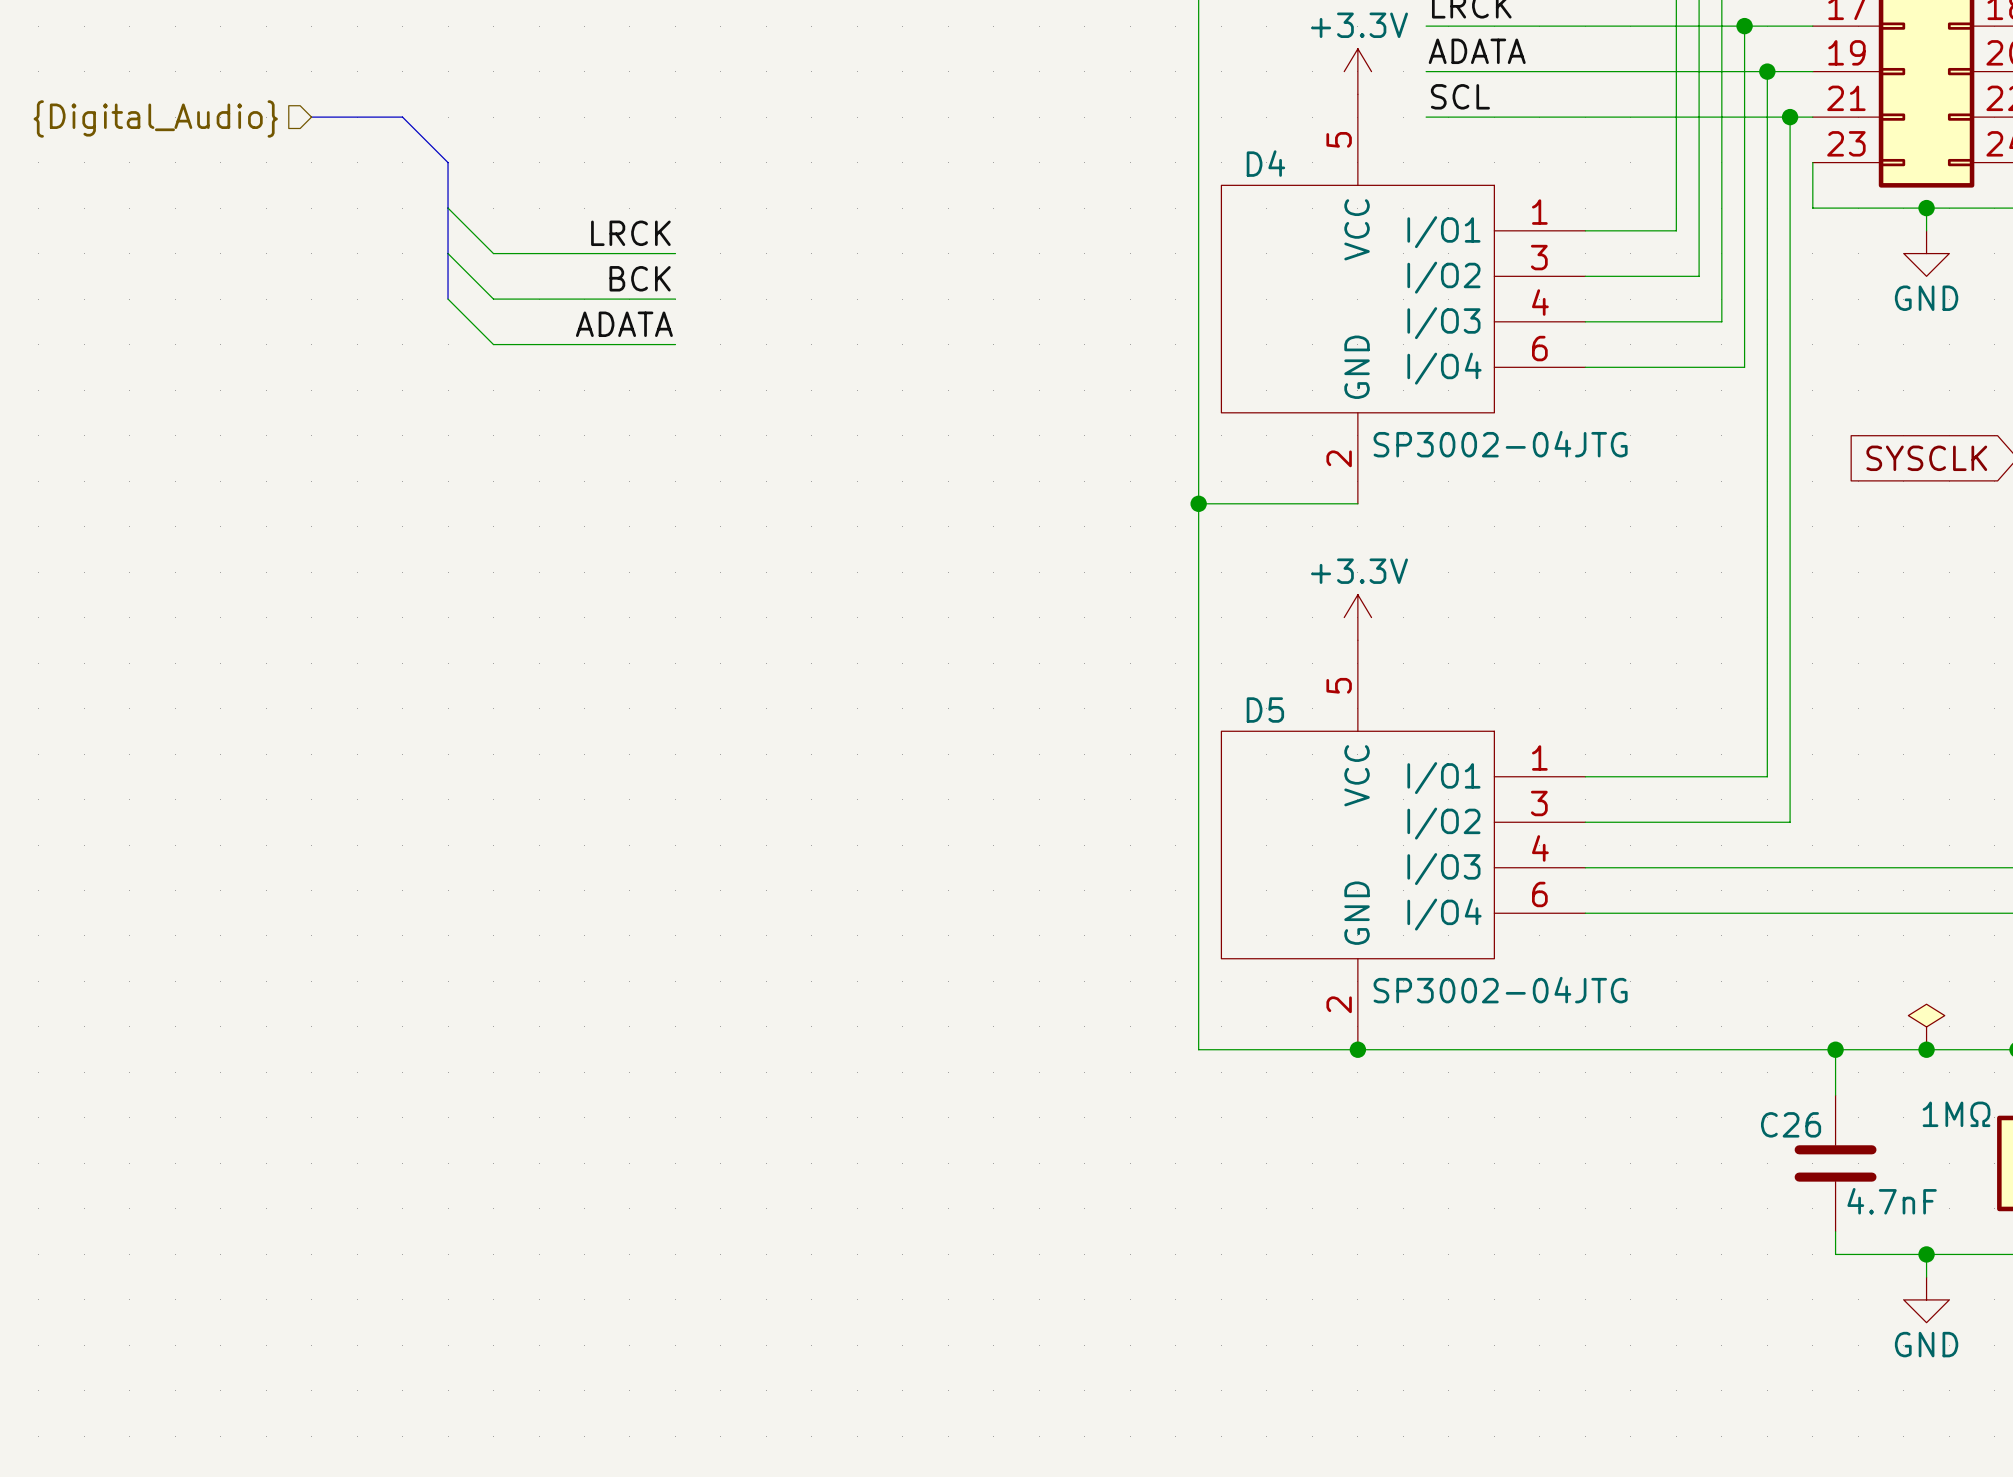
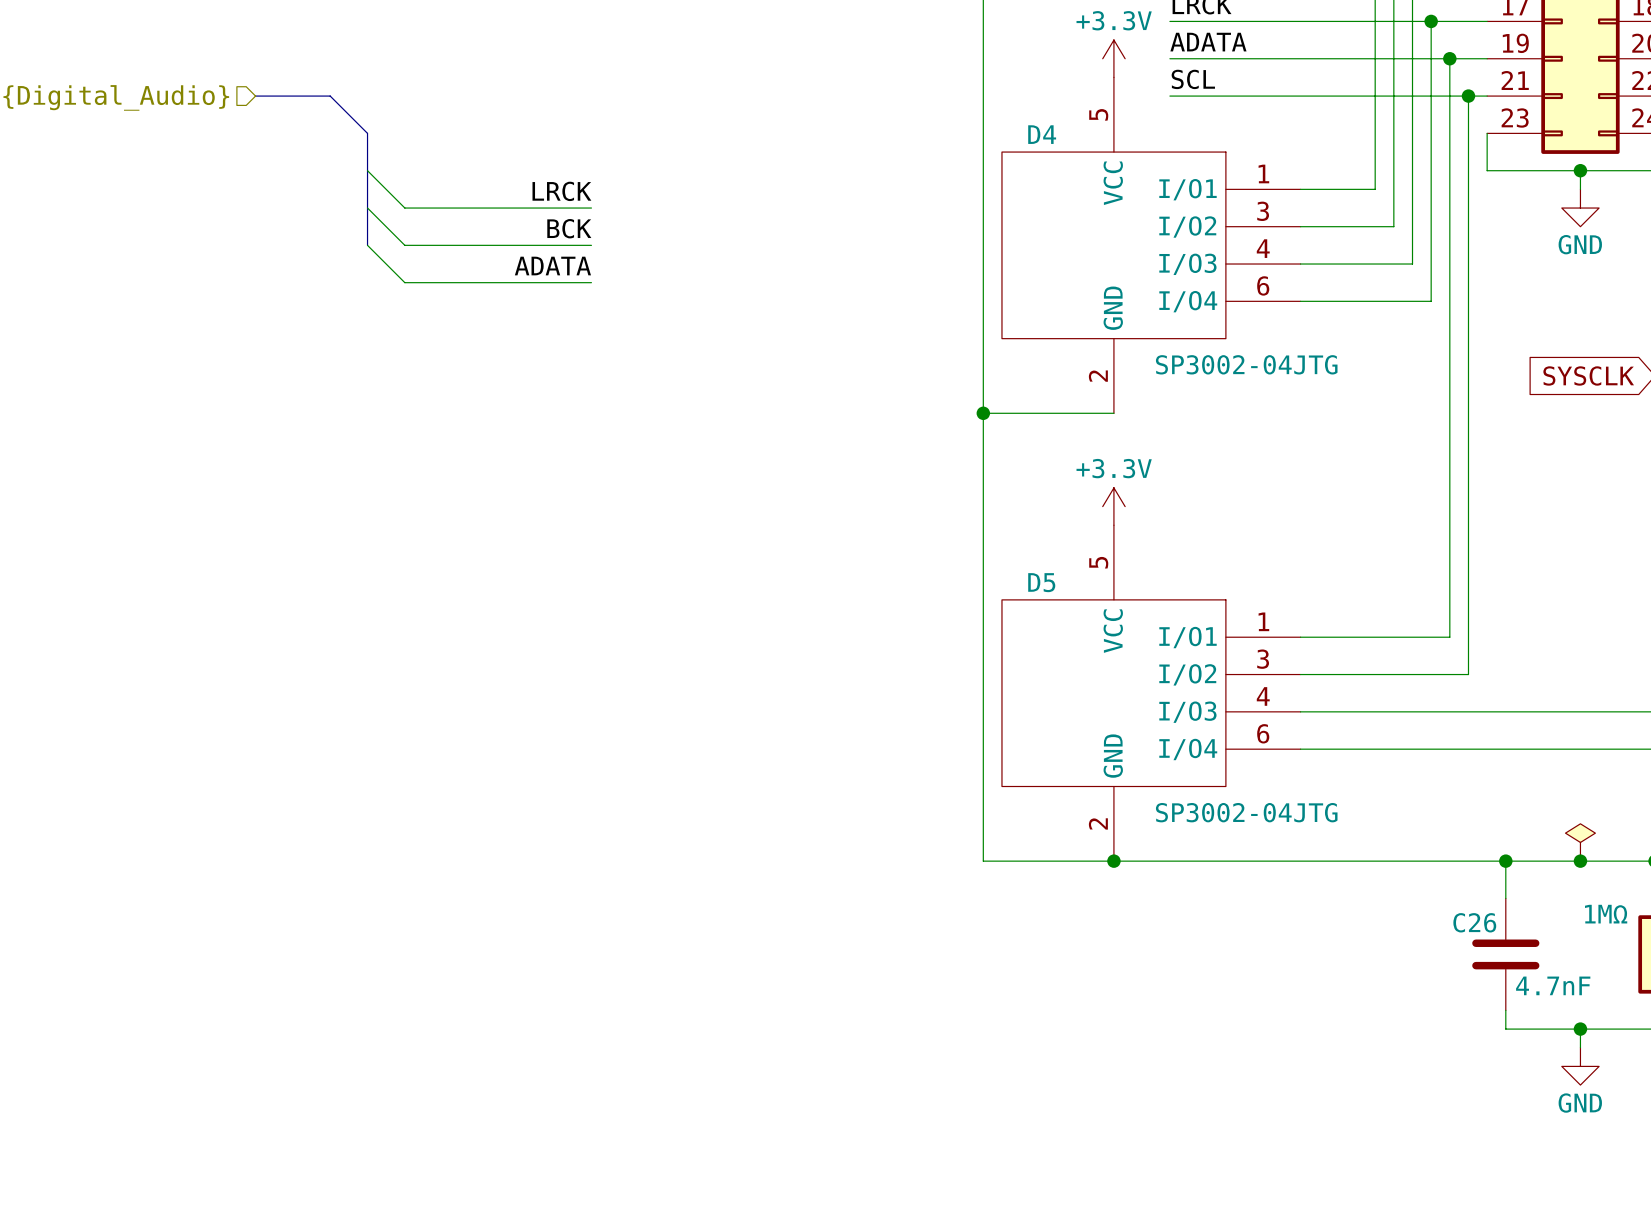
label position: LRCK (630, 233) -> LRCK (561, 191)
wire: none -> (554, 208) (591, 208)
label position: BCK (640, 278) -> BCK (569, 228)
wire: none -> (554, 245) (591, 245)
label position: ADATA (624, 324) -> ADATA (552, 266)
wire: none -> (554, 282) (591, 282)

